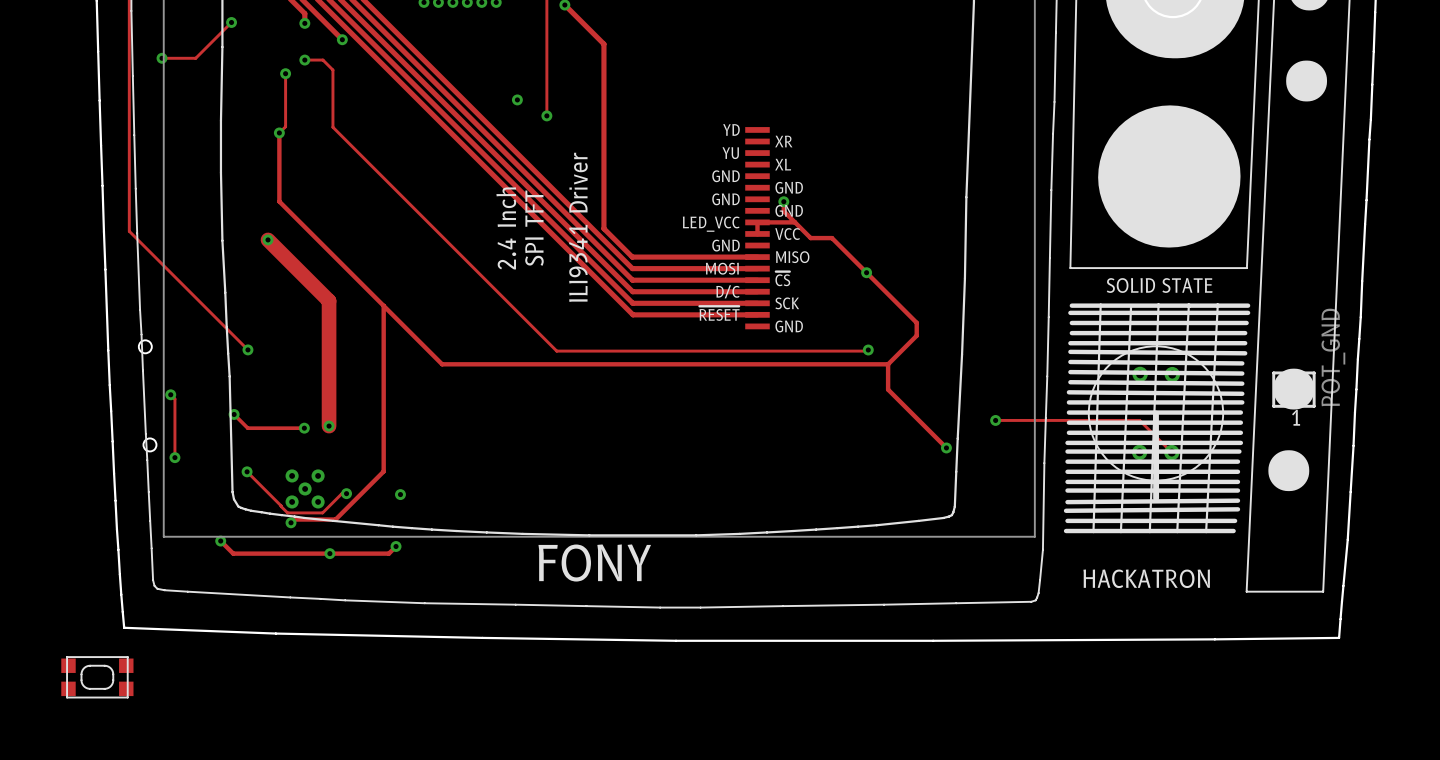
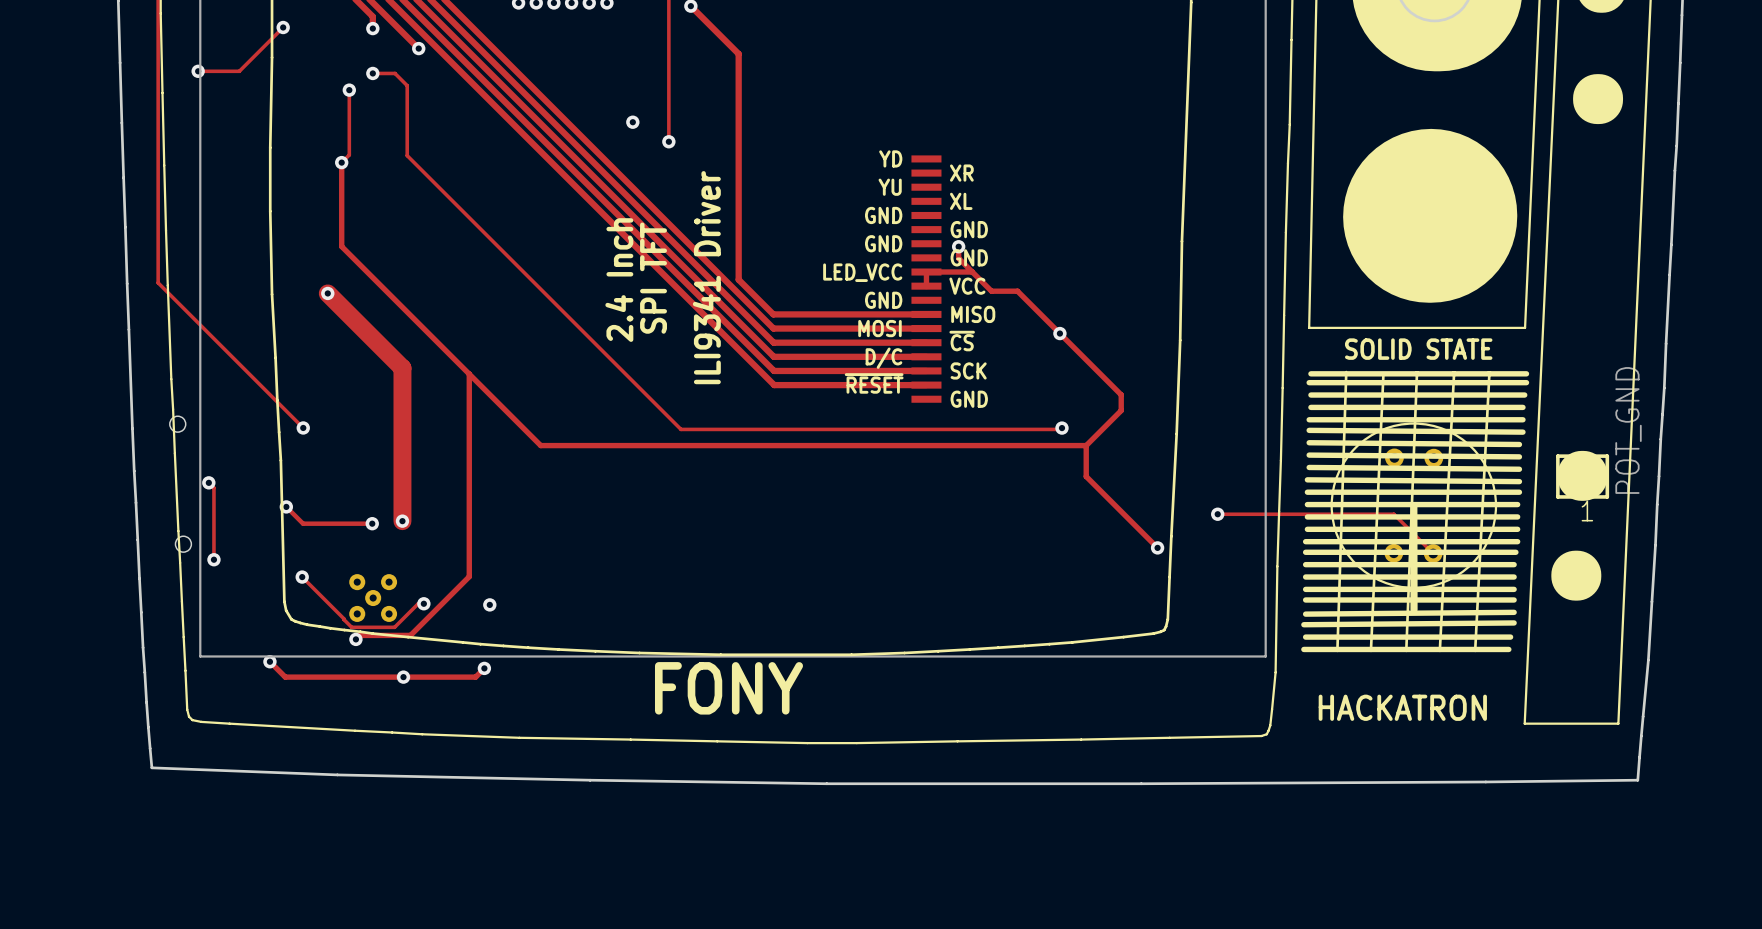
part: (97, 677) -> none

